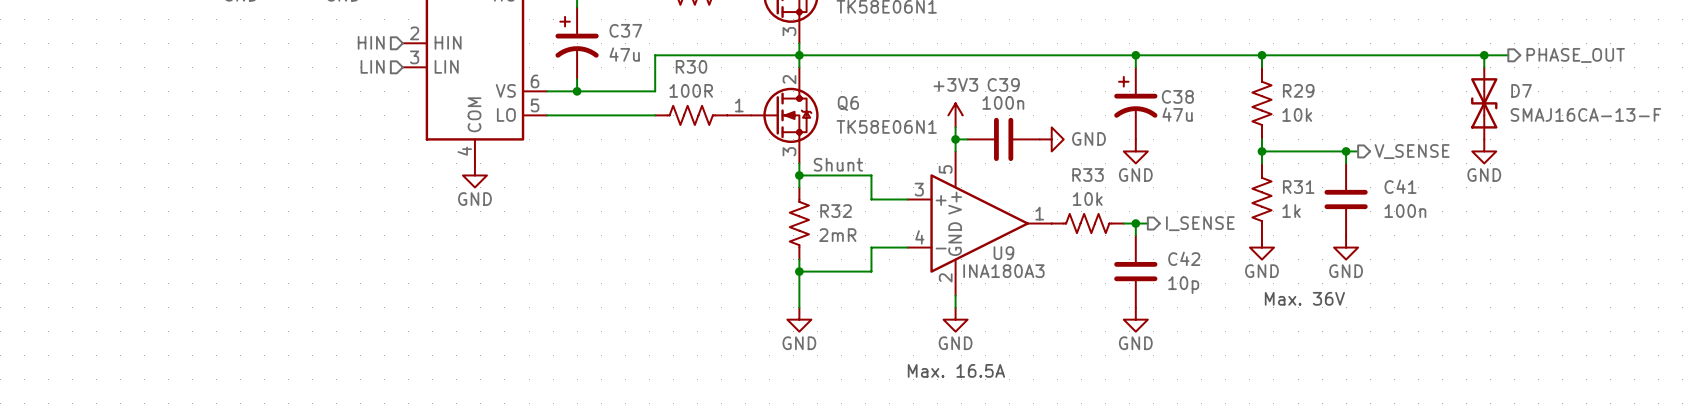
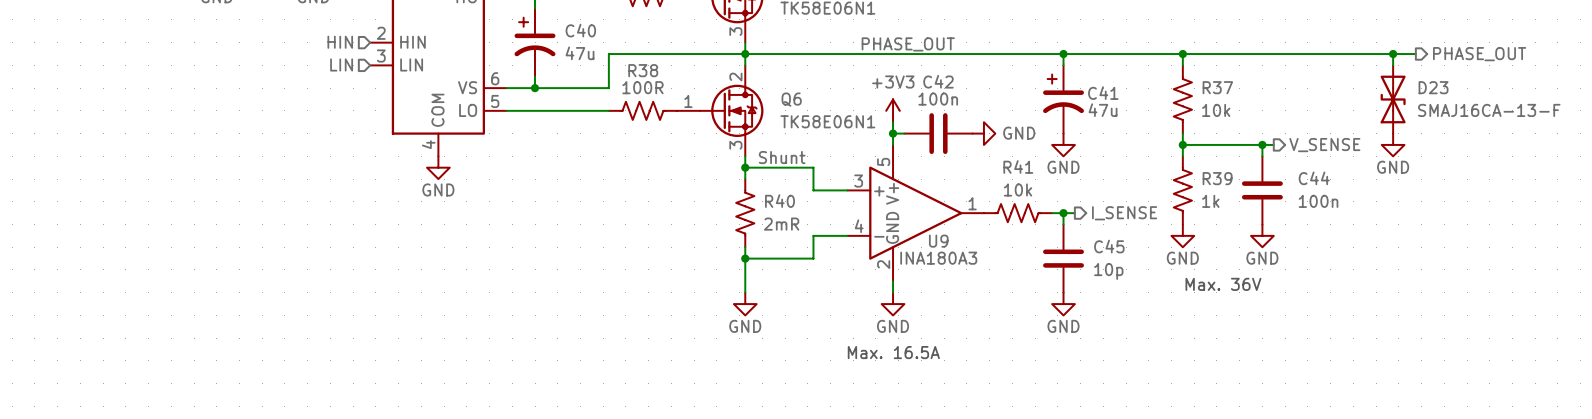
C37 name: C37 (625, 30) -> C40 (580, 30)
label: none -> PHASE_OUT (908, 44)
R30 name: R30 (691, 66) -> R38 (643, 70)
C39 name: C39 (1003, 84) -> C42 (938, 81)
R29 name: R29 (1298, 90) -> R37 (1217, 87)
D7 name: D7 (1521, 90) -> D23 (1433, 87)
C38 name: C38 (1177, 96) -> C41 (1103, 93)
R33 name: R33 (1088, 175) -> R41 (1018, 166)
C41 name: C41 (1400, 186) -> C44 (1314, 178)
R31 name: R31 (1298, 187) -> R39 (1217, 178)
R32 name: R32 (836, 211) -> R40 (779, 201)
C42 name: C42 (1184, 258) -> C45 (1109, 246)

